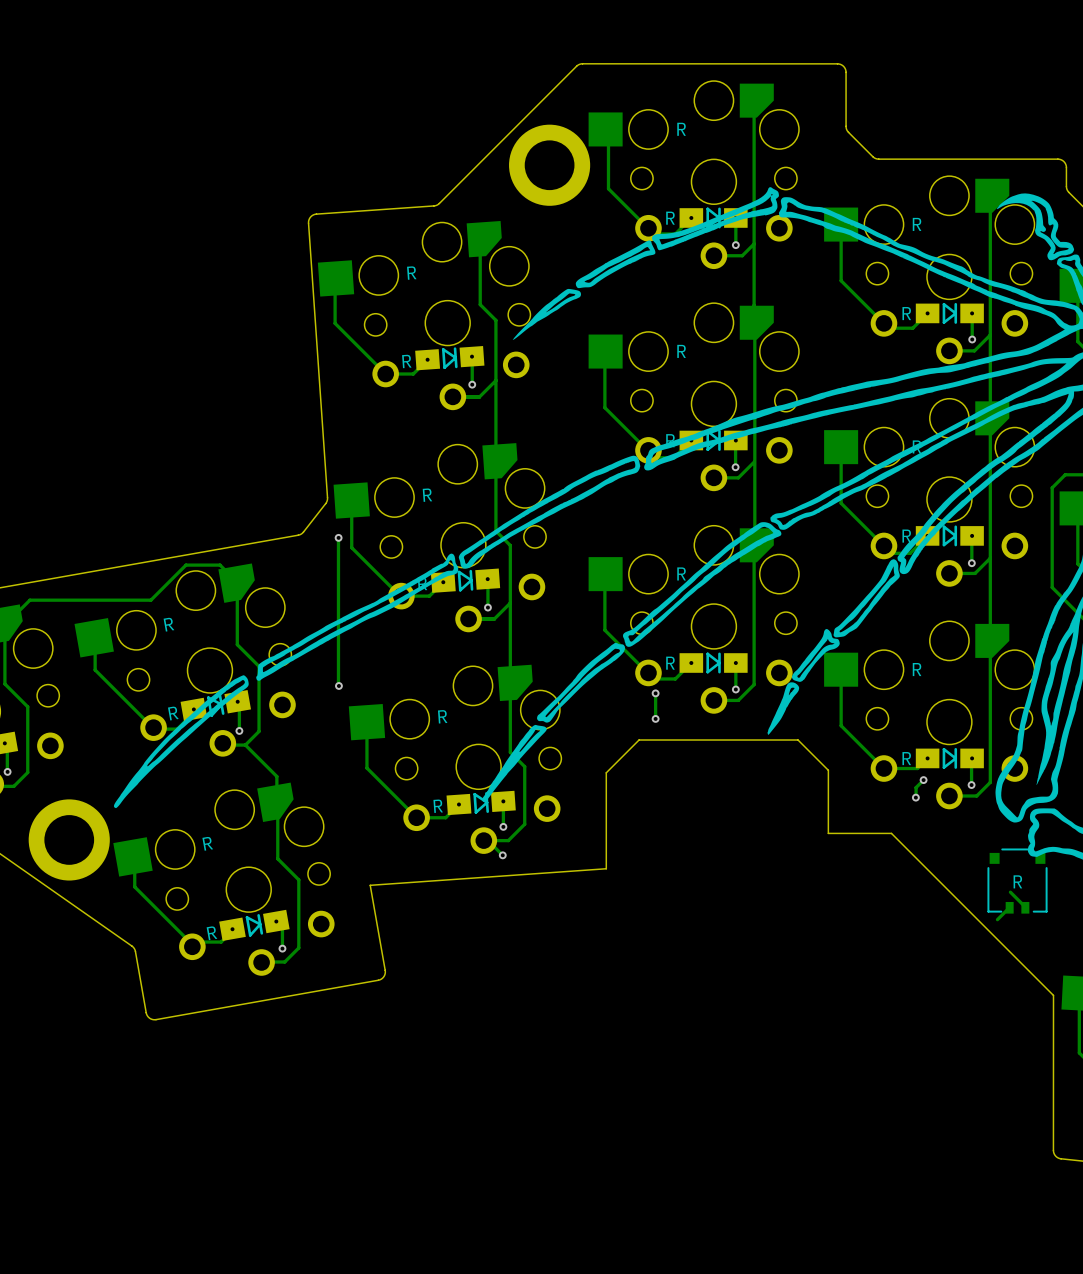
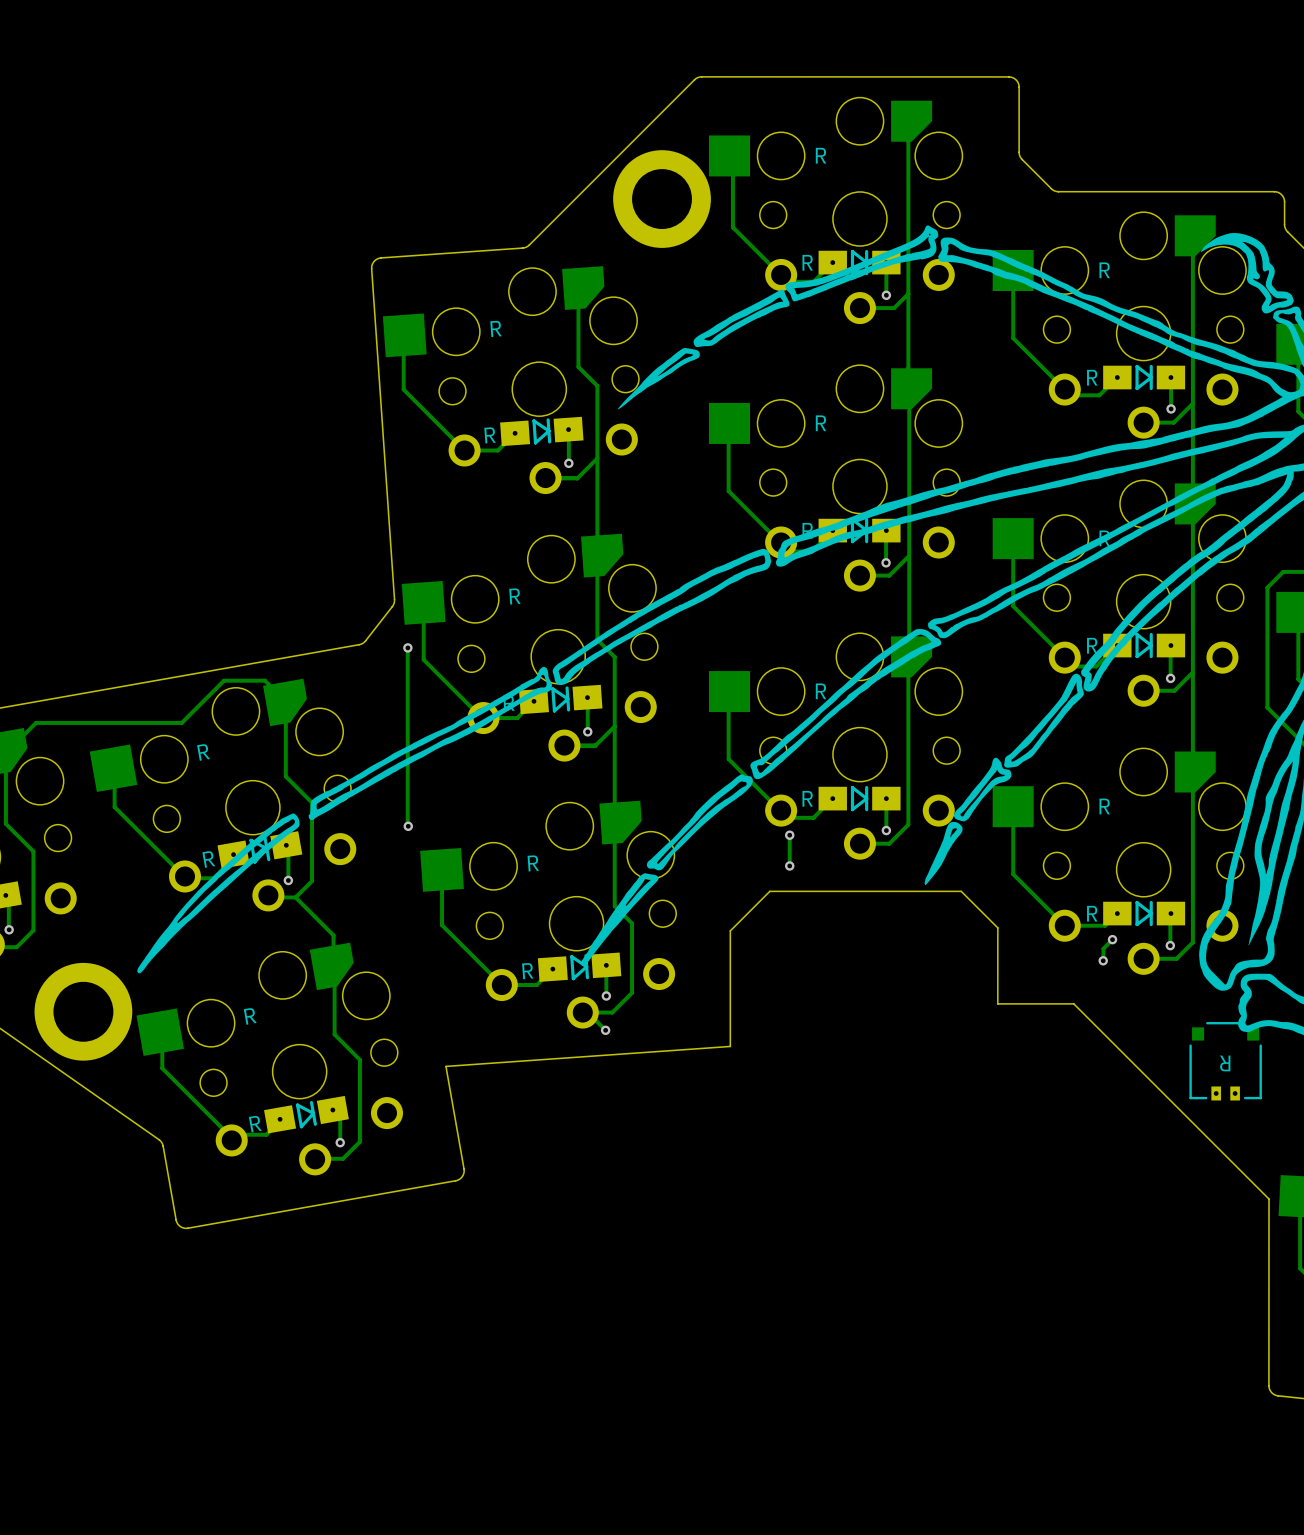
part footprint: [987, 848, 1048, 914] -> [1189, 1022, 1262, 1101]
track: (1010, 892) (1026, 907) -> none
track: (1009, 907) (997, 919) -> none

